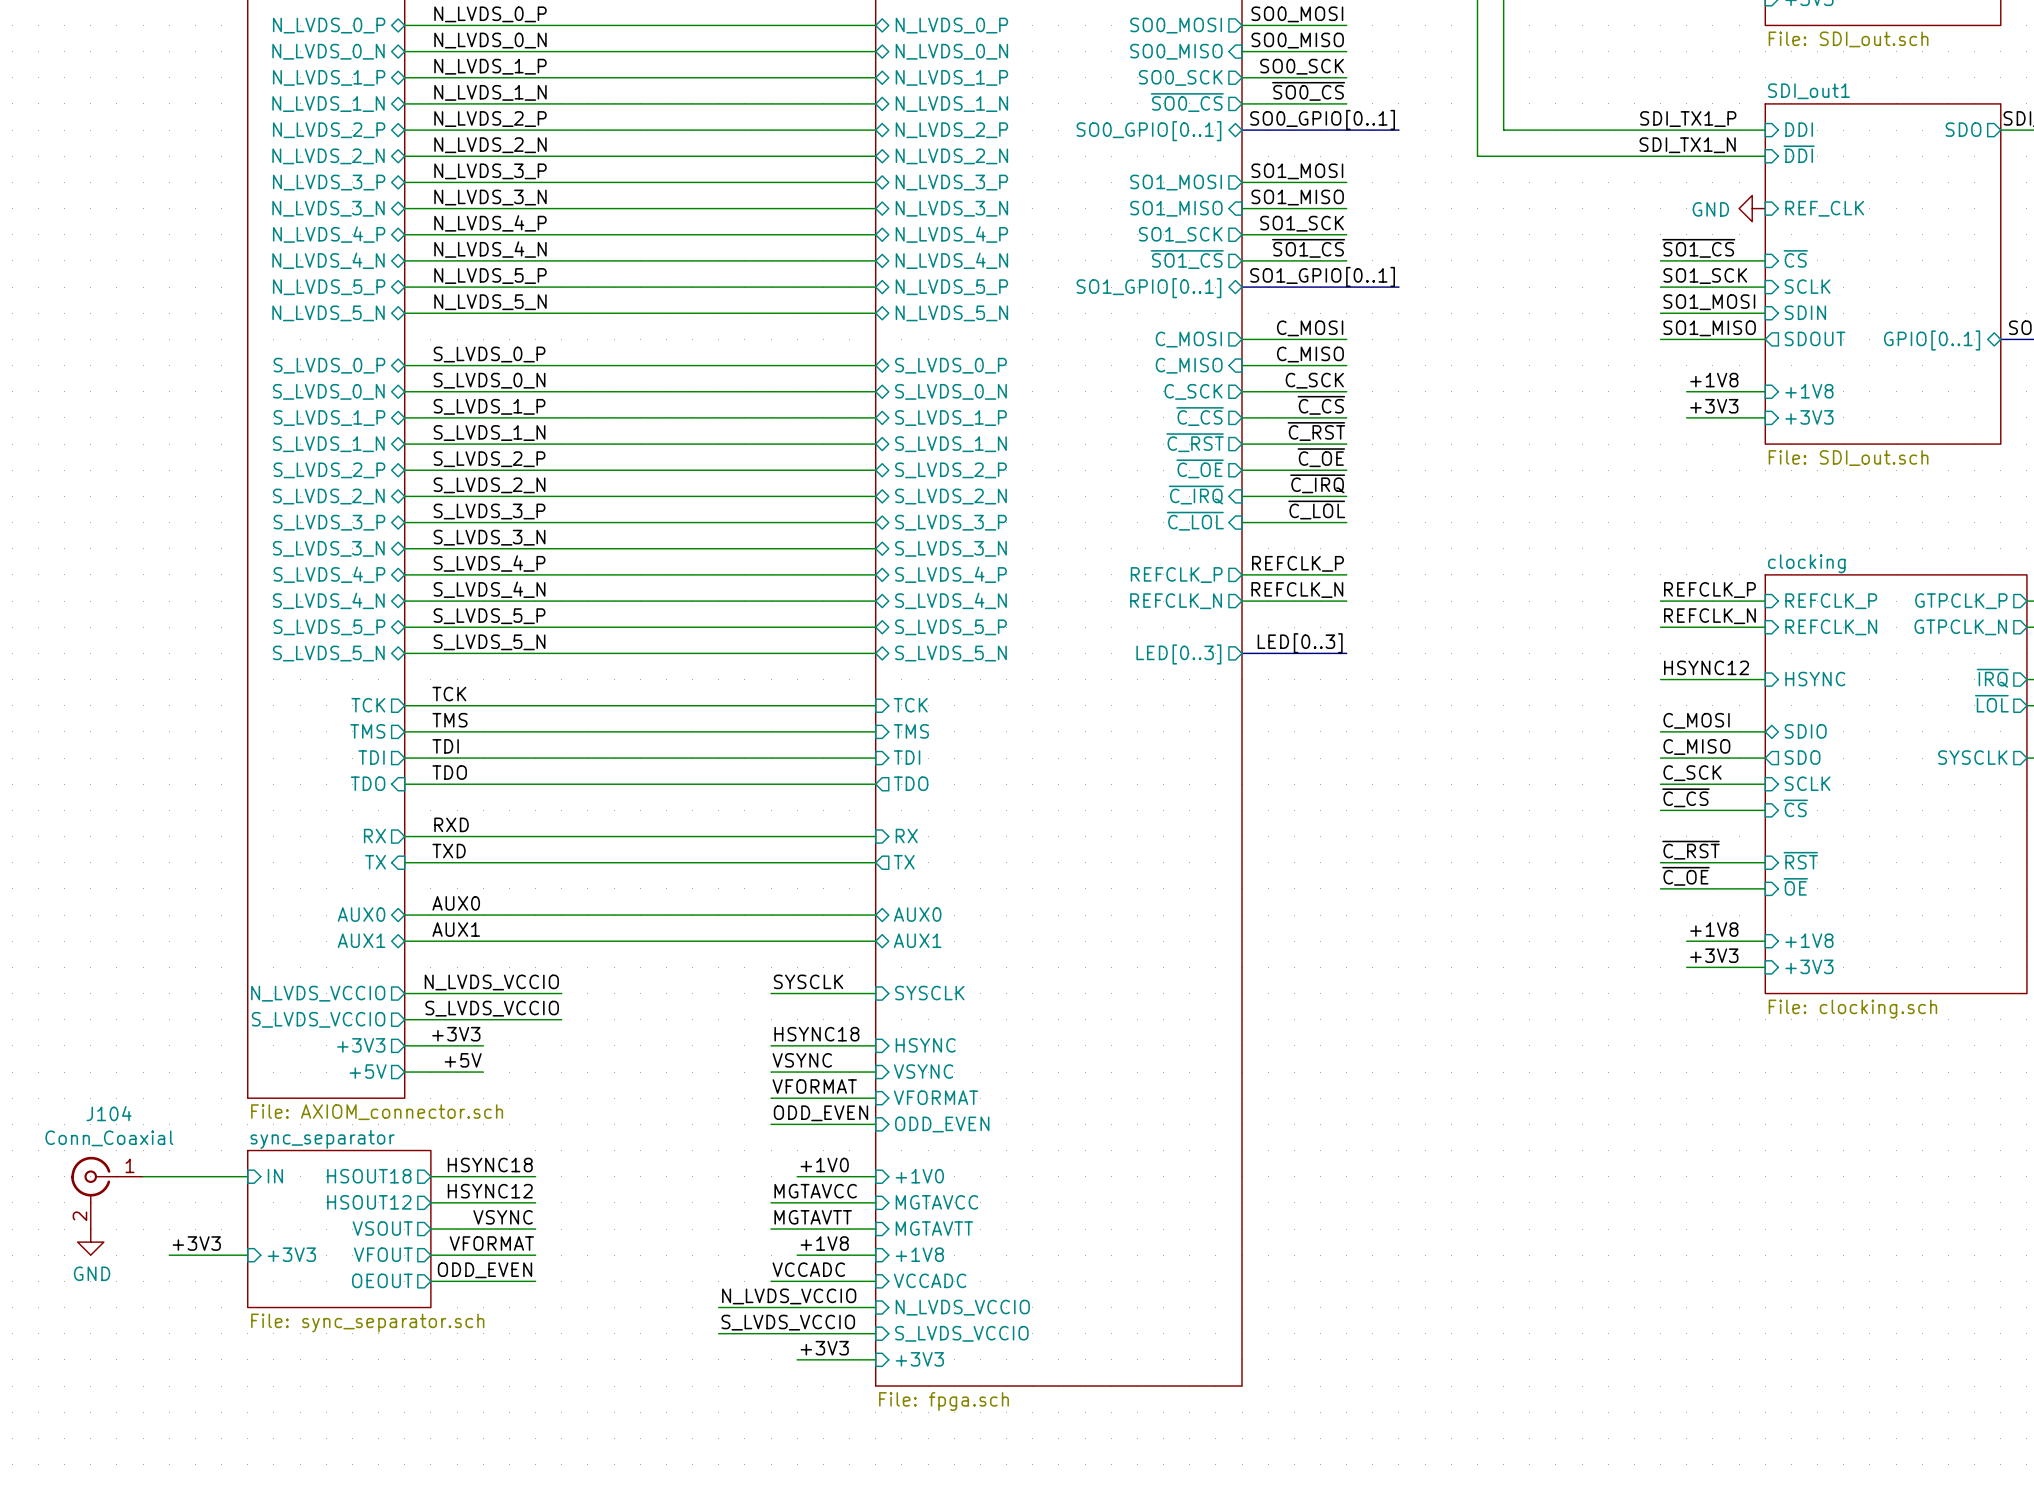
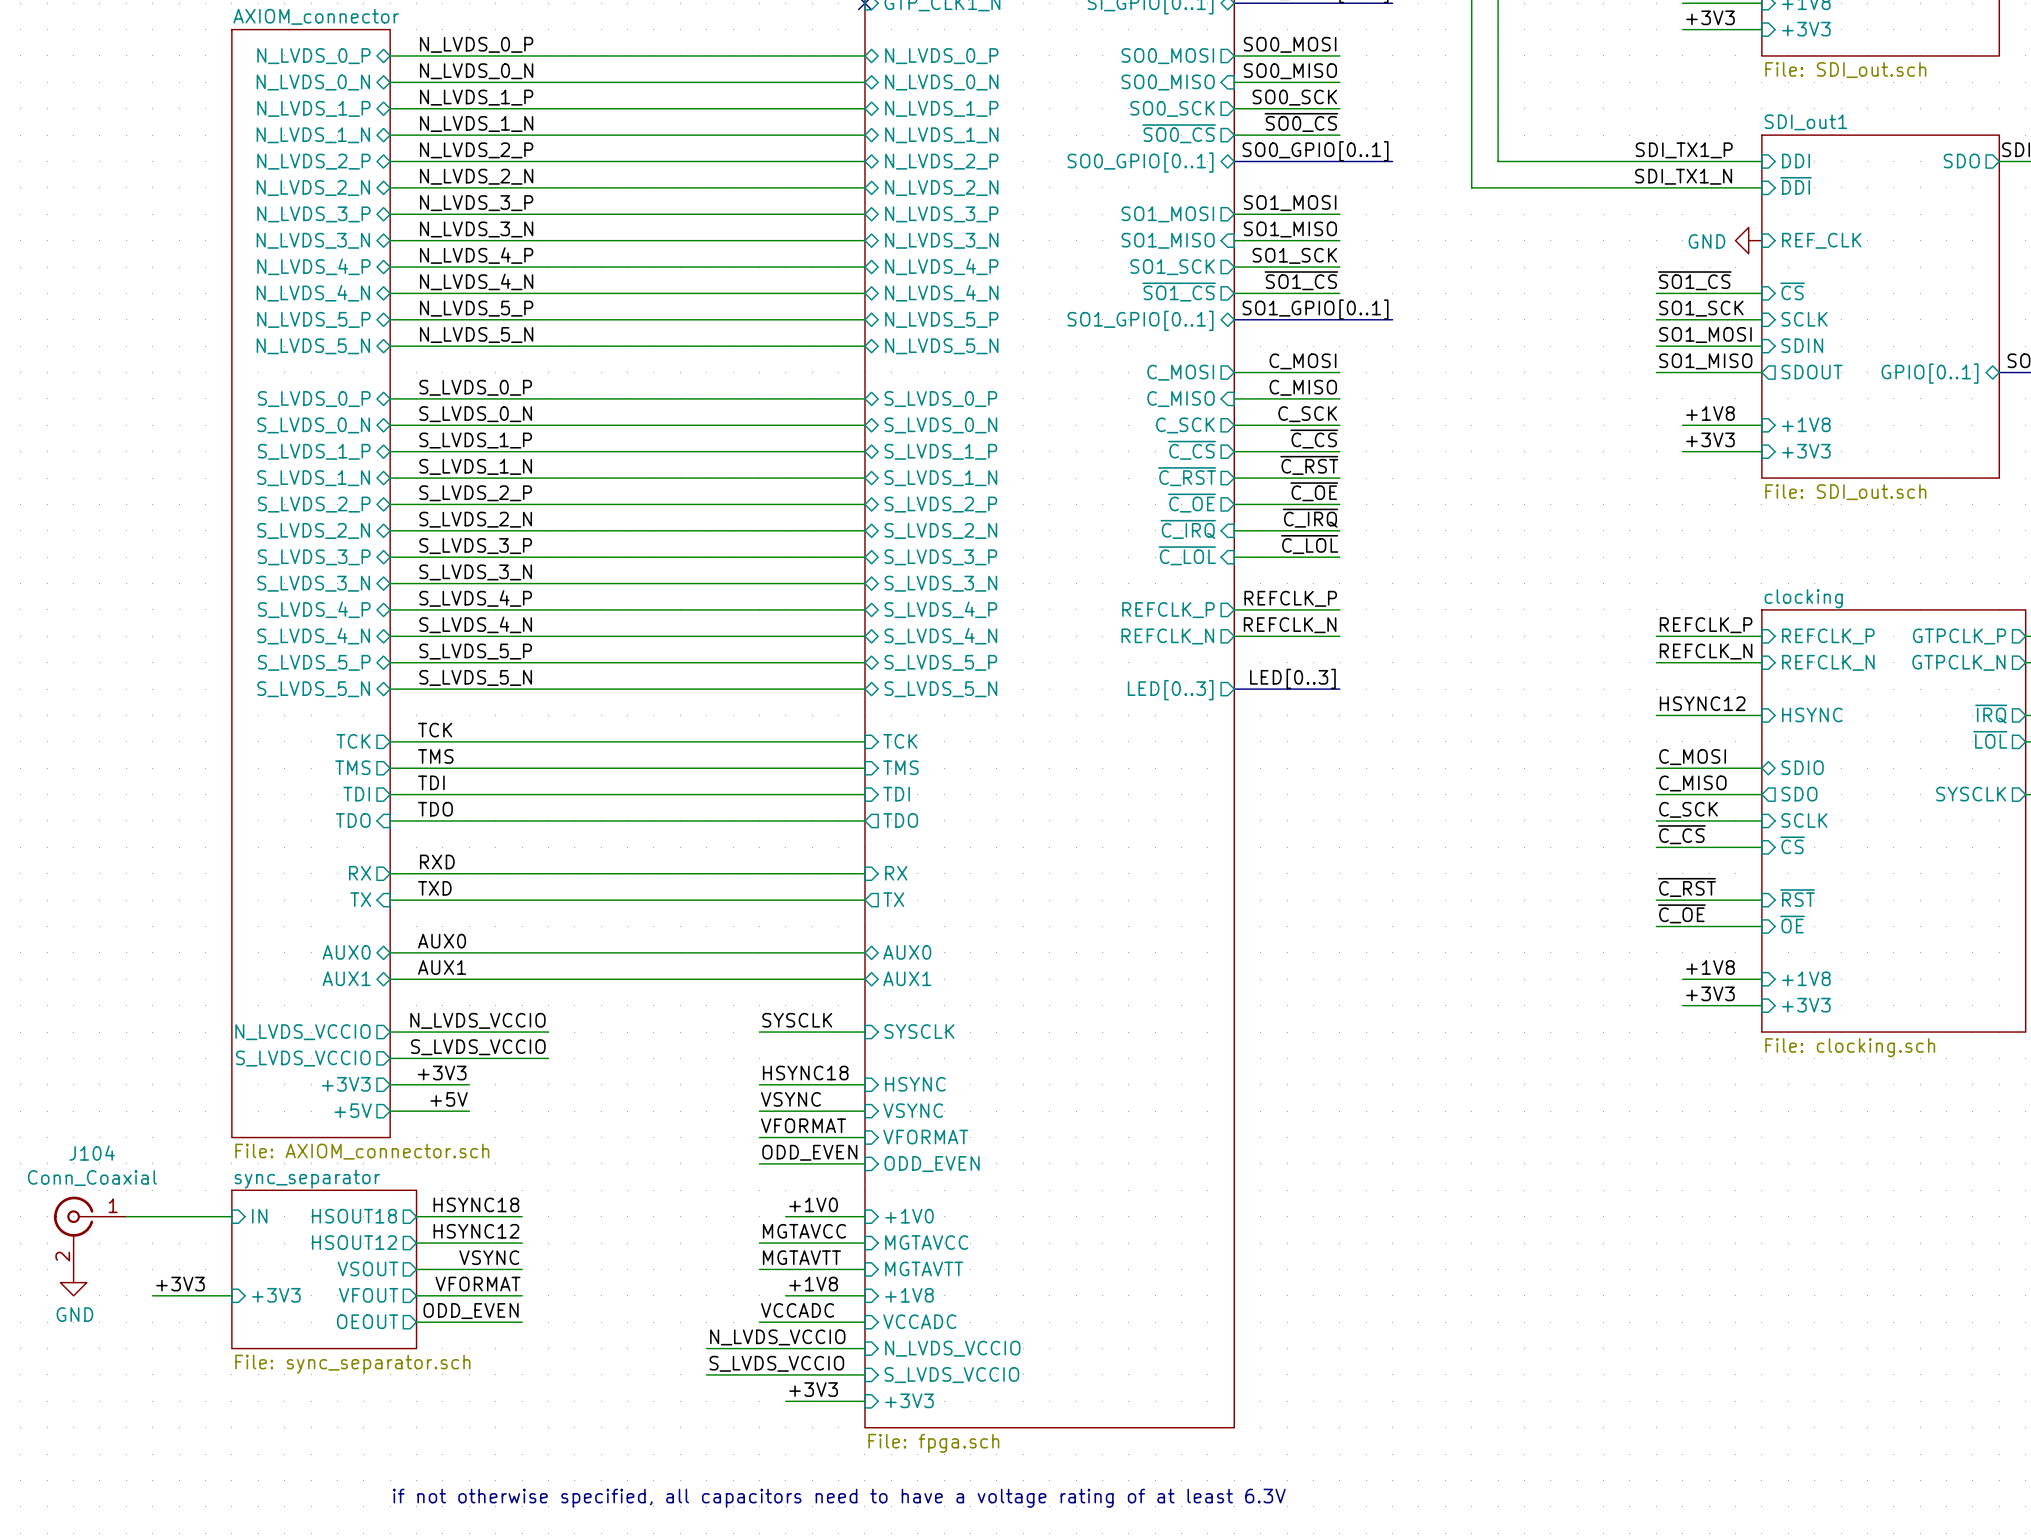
text: none -> if not otherwise specified, all capacitors need to have a voltage rating of at least 6.3V (839, 1498)

